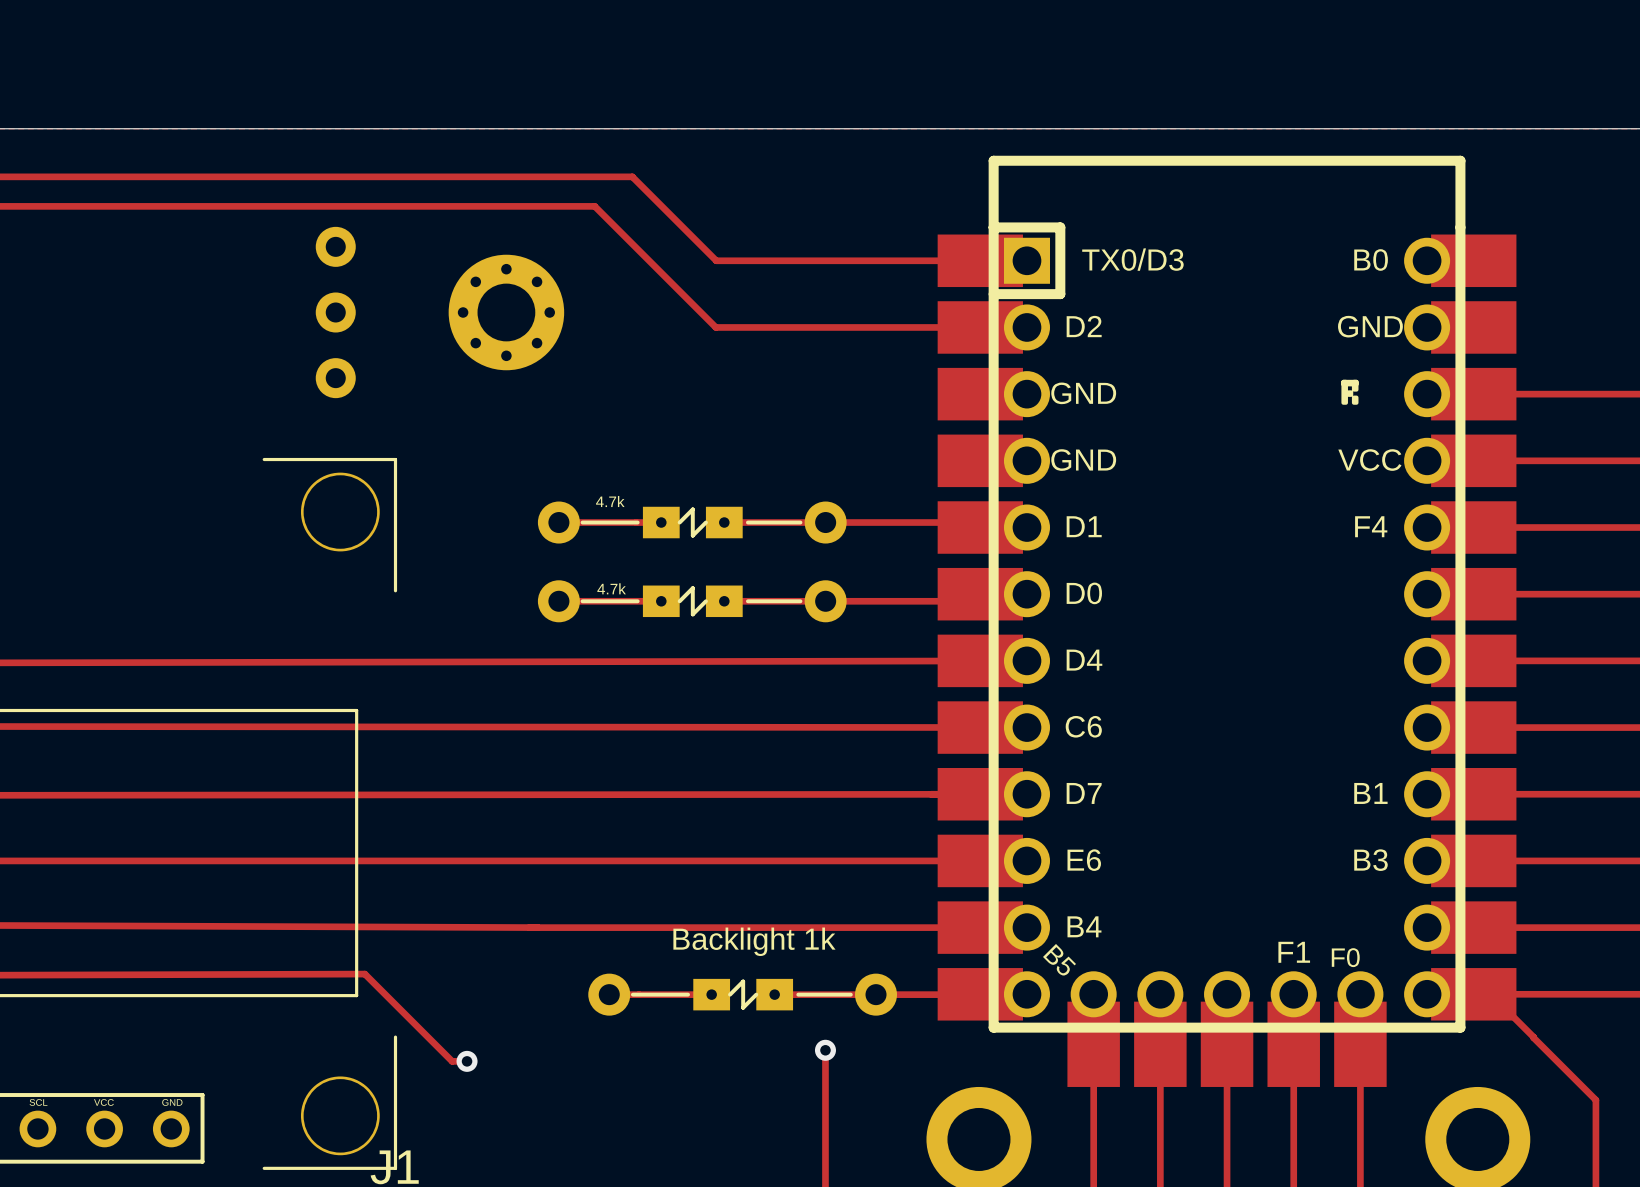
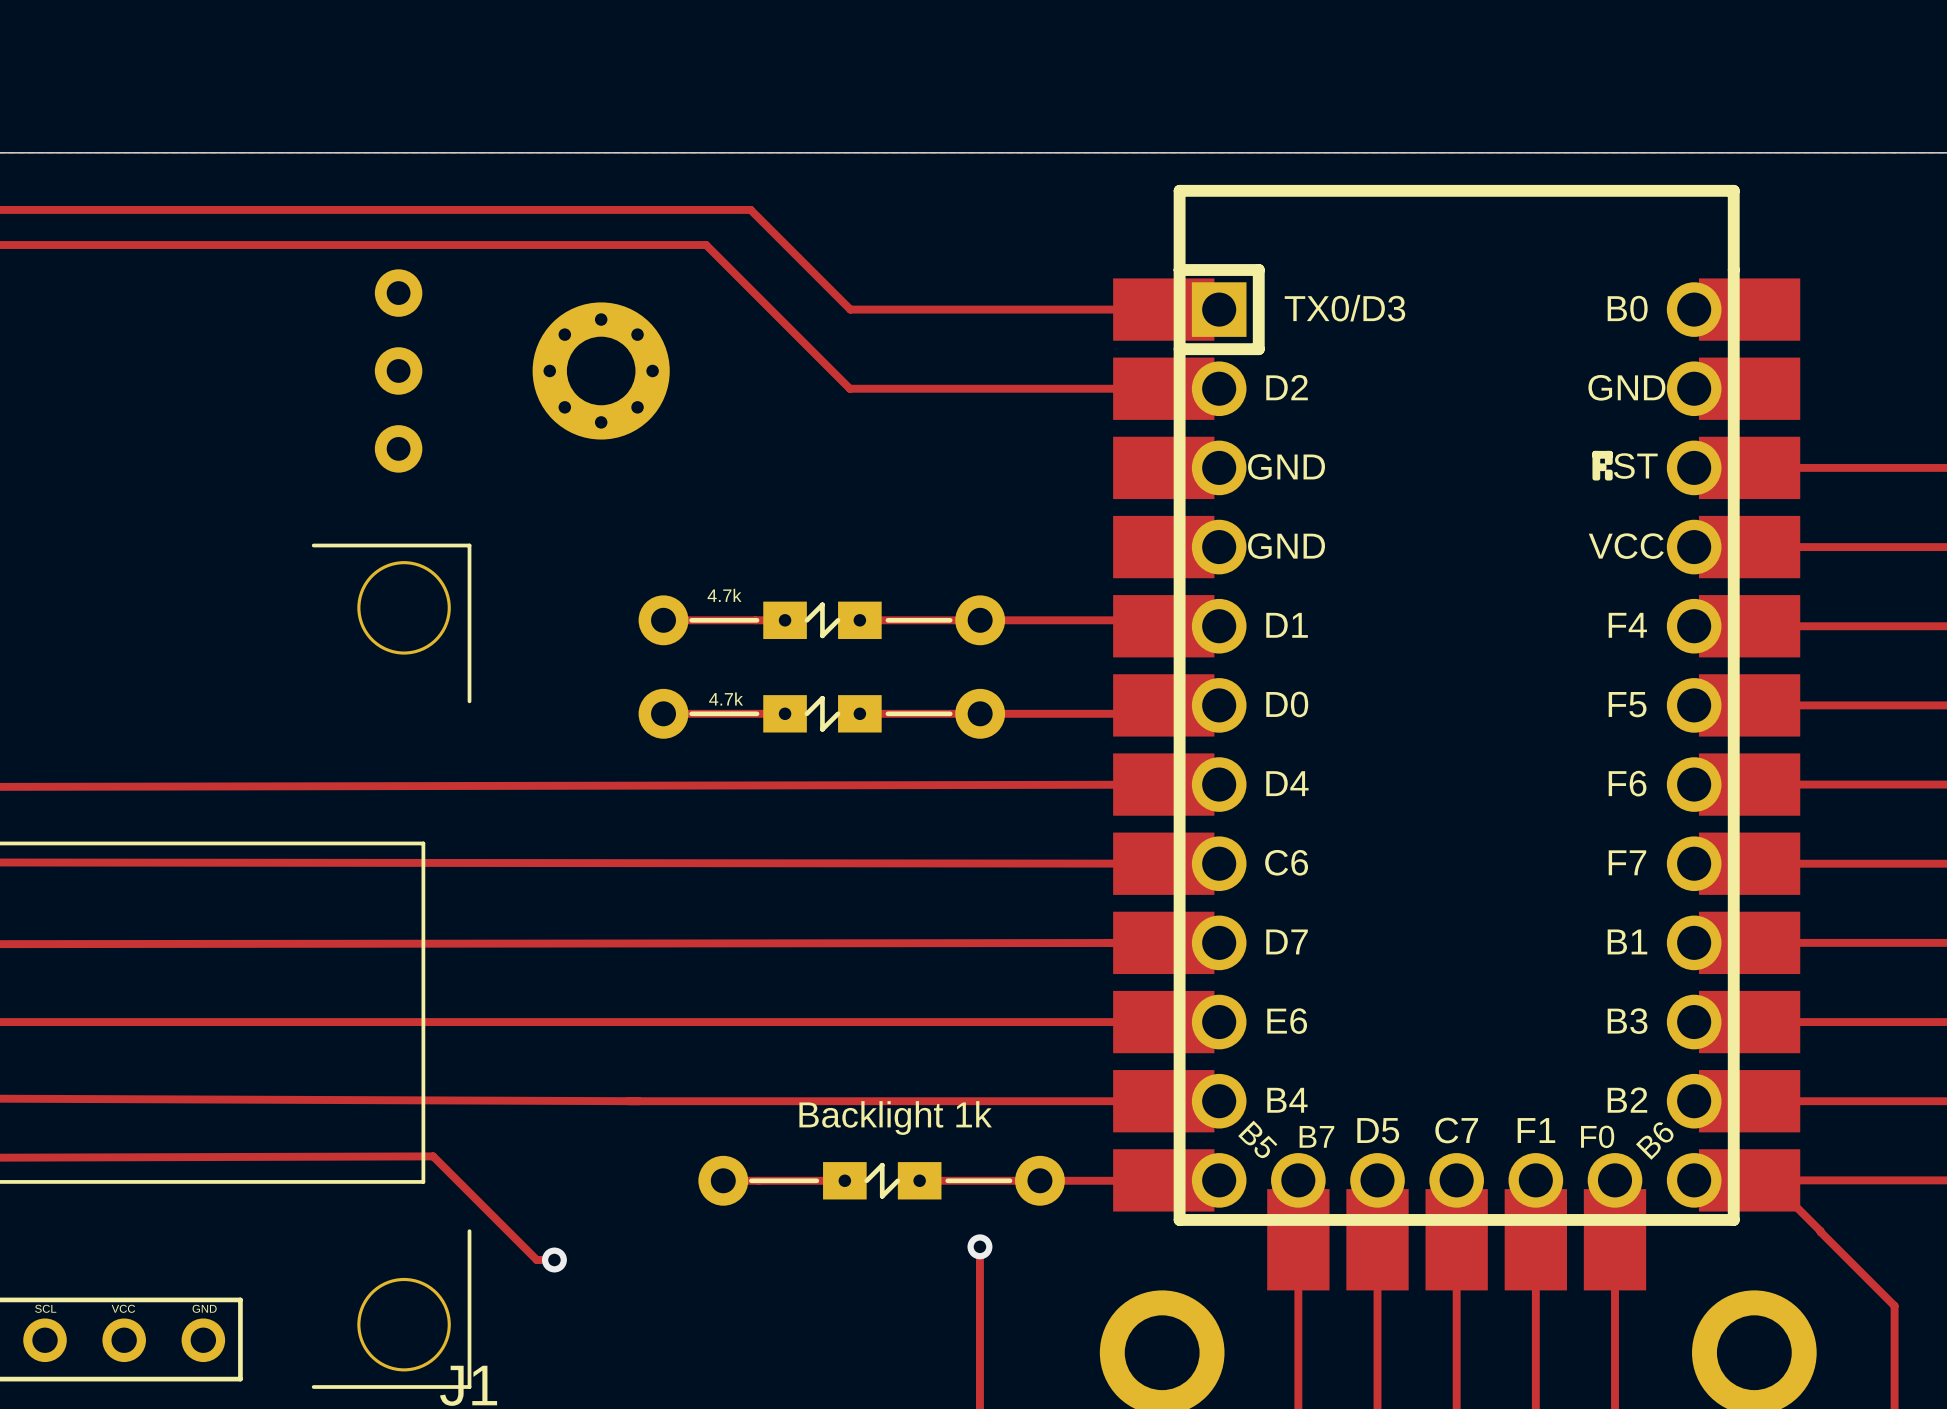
part footprint: [937, 155, 1517, 1087] -> [1113, 184, 1801, 1291]

